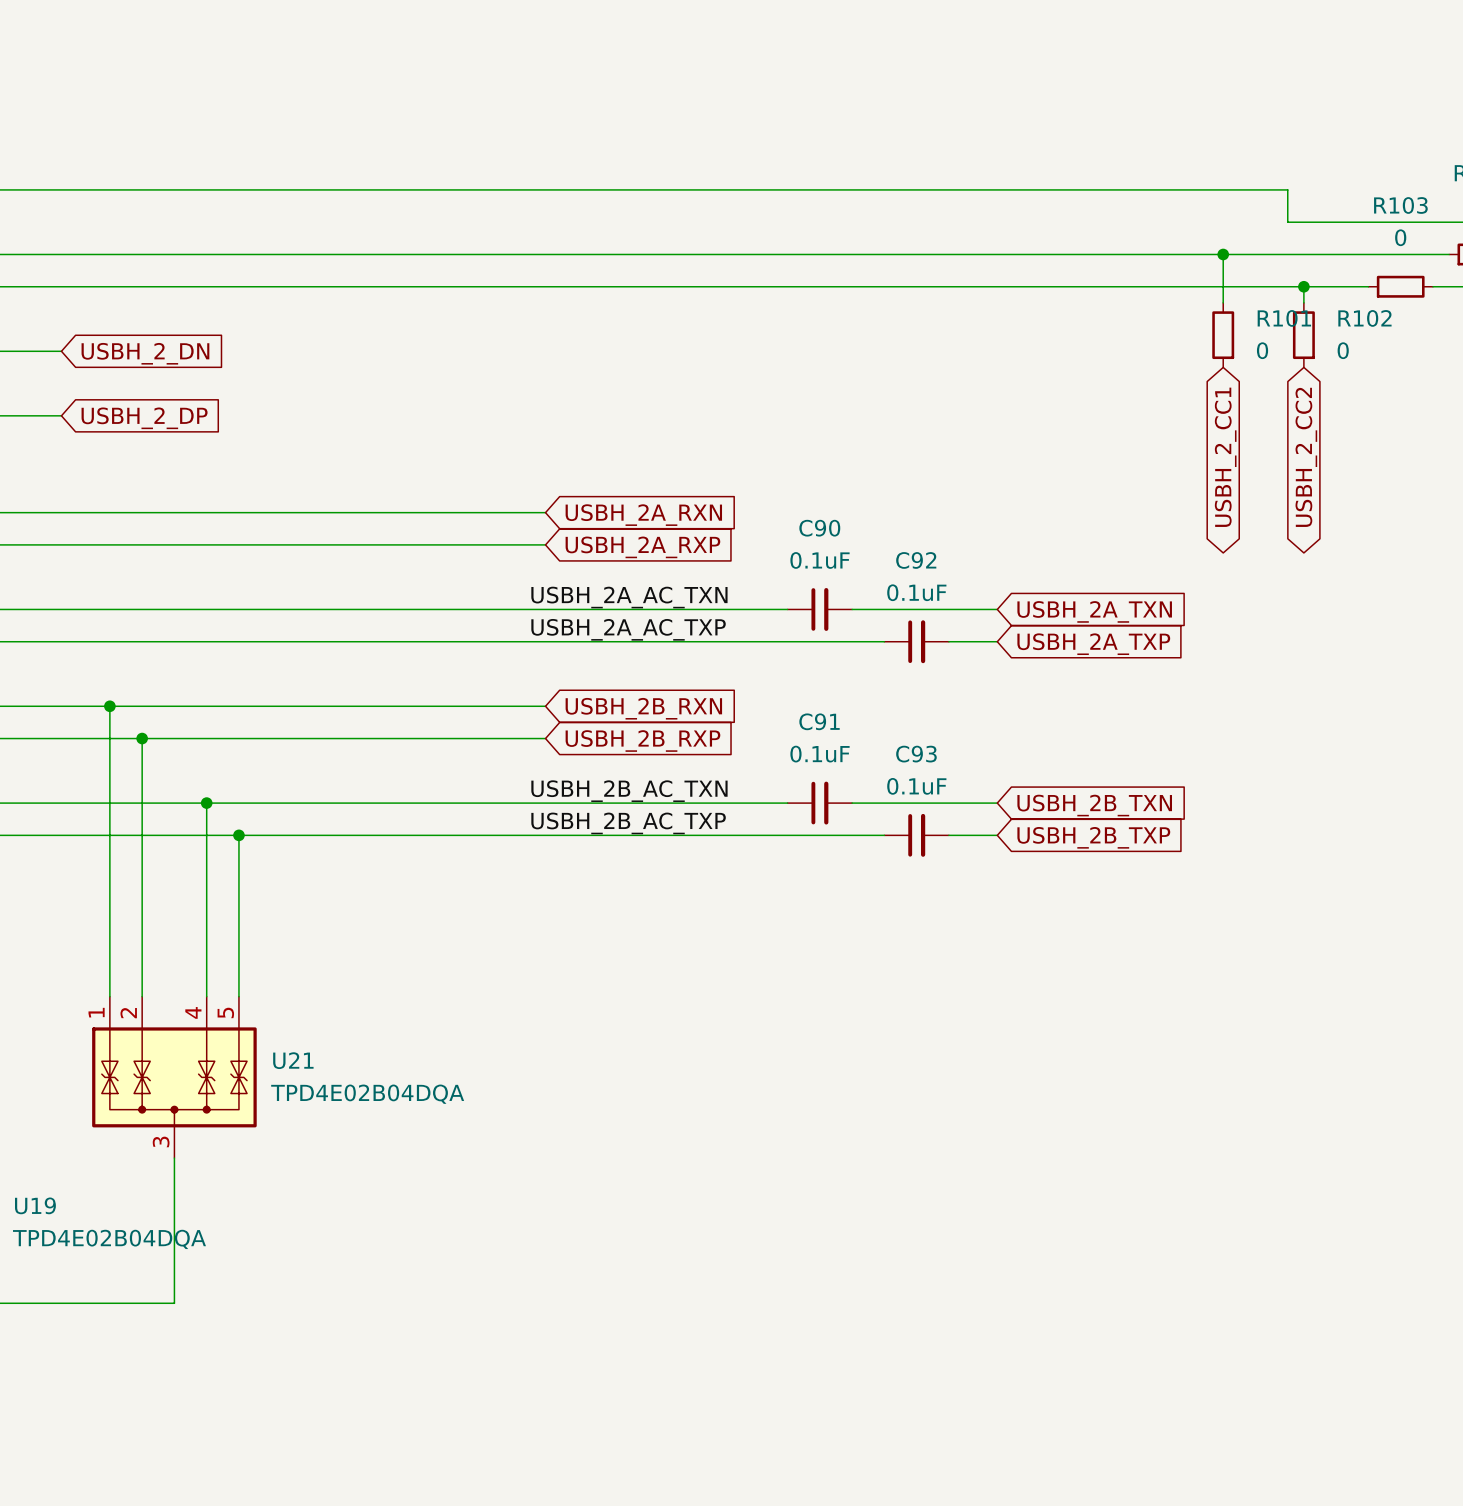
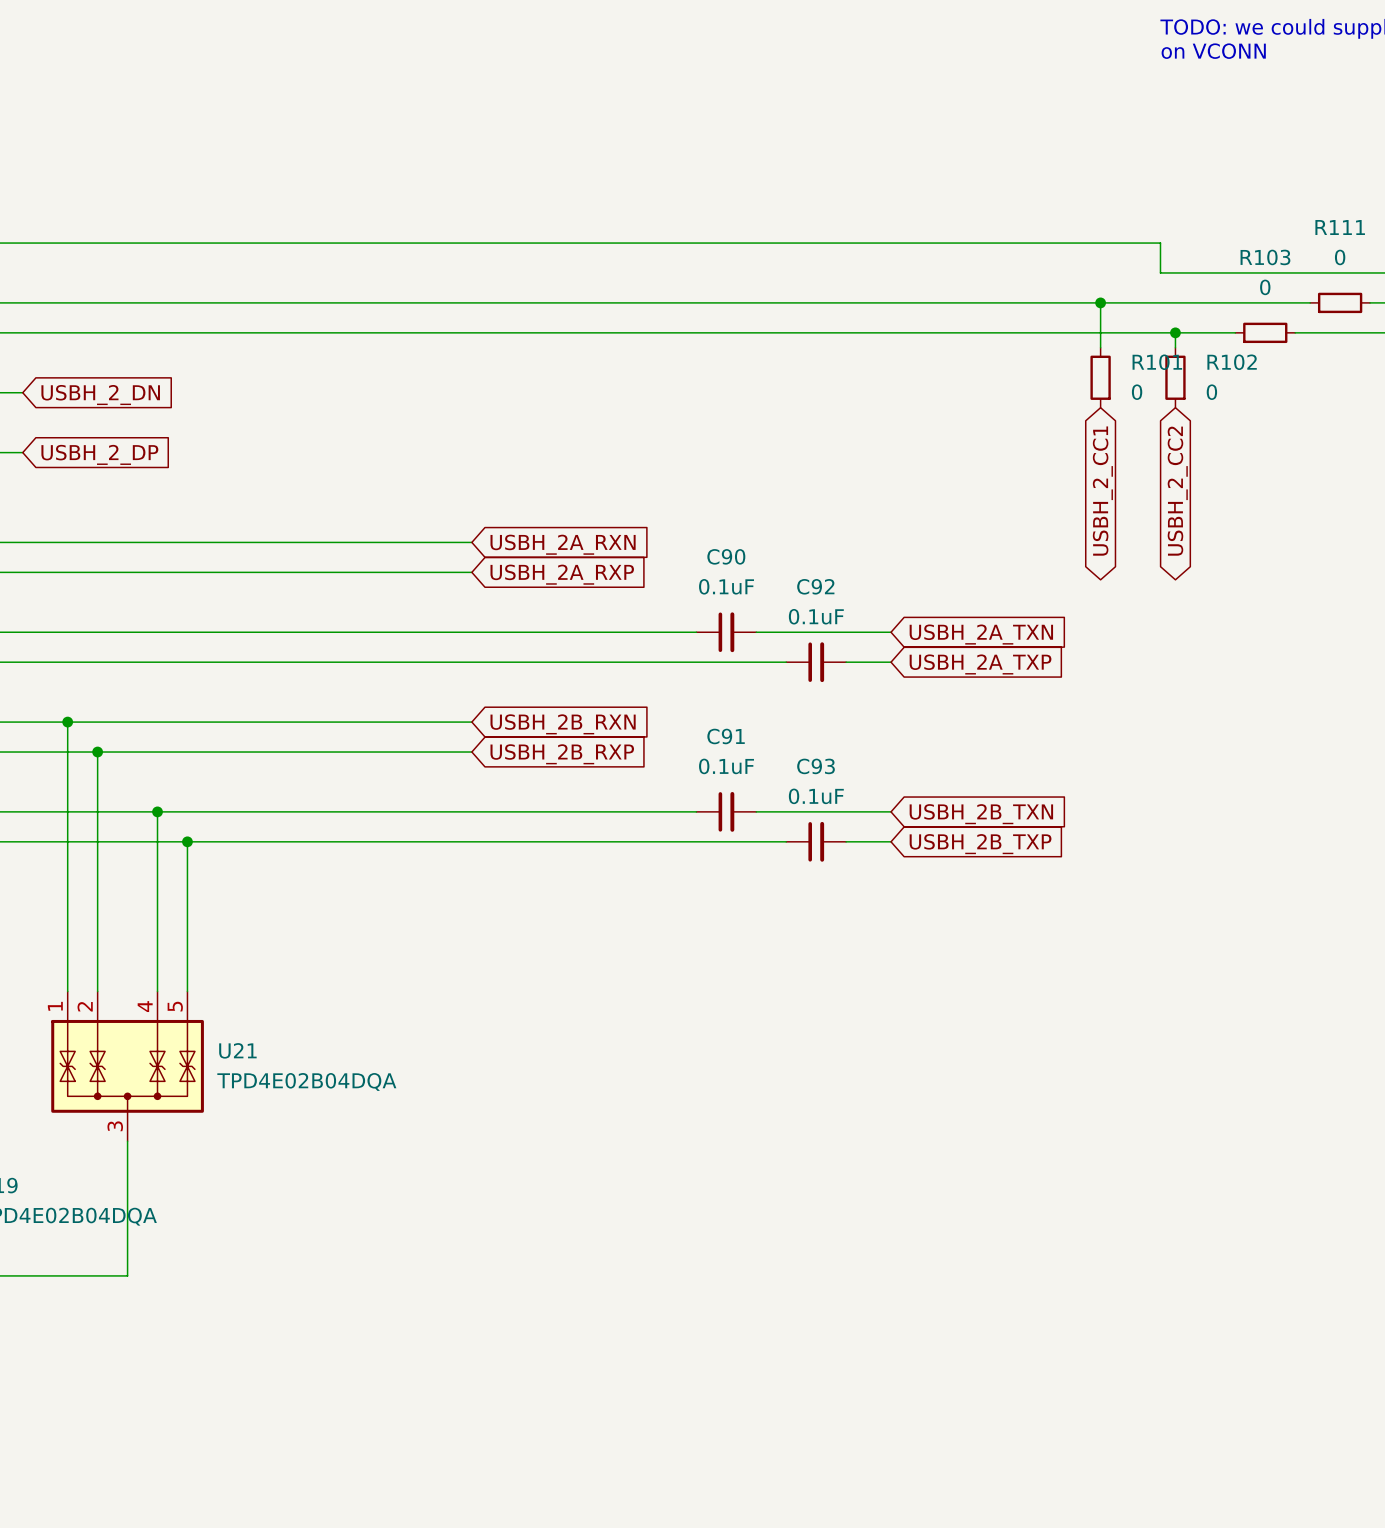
label: USBH_2A_AC_TXN (629, 597) -> none
label: USBH_2A_AC_TXP (628, 629) -> none
label: USBH_2B_AC_TXN (629, 791) -> none
label: USBH_2B_AC_TXP (628, 823) -> none

